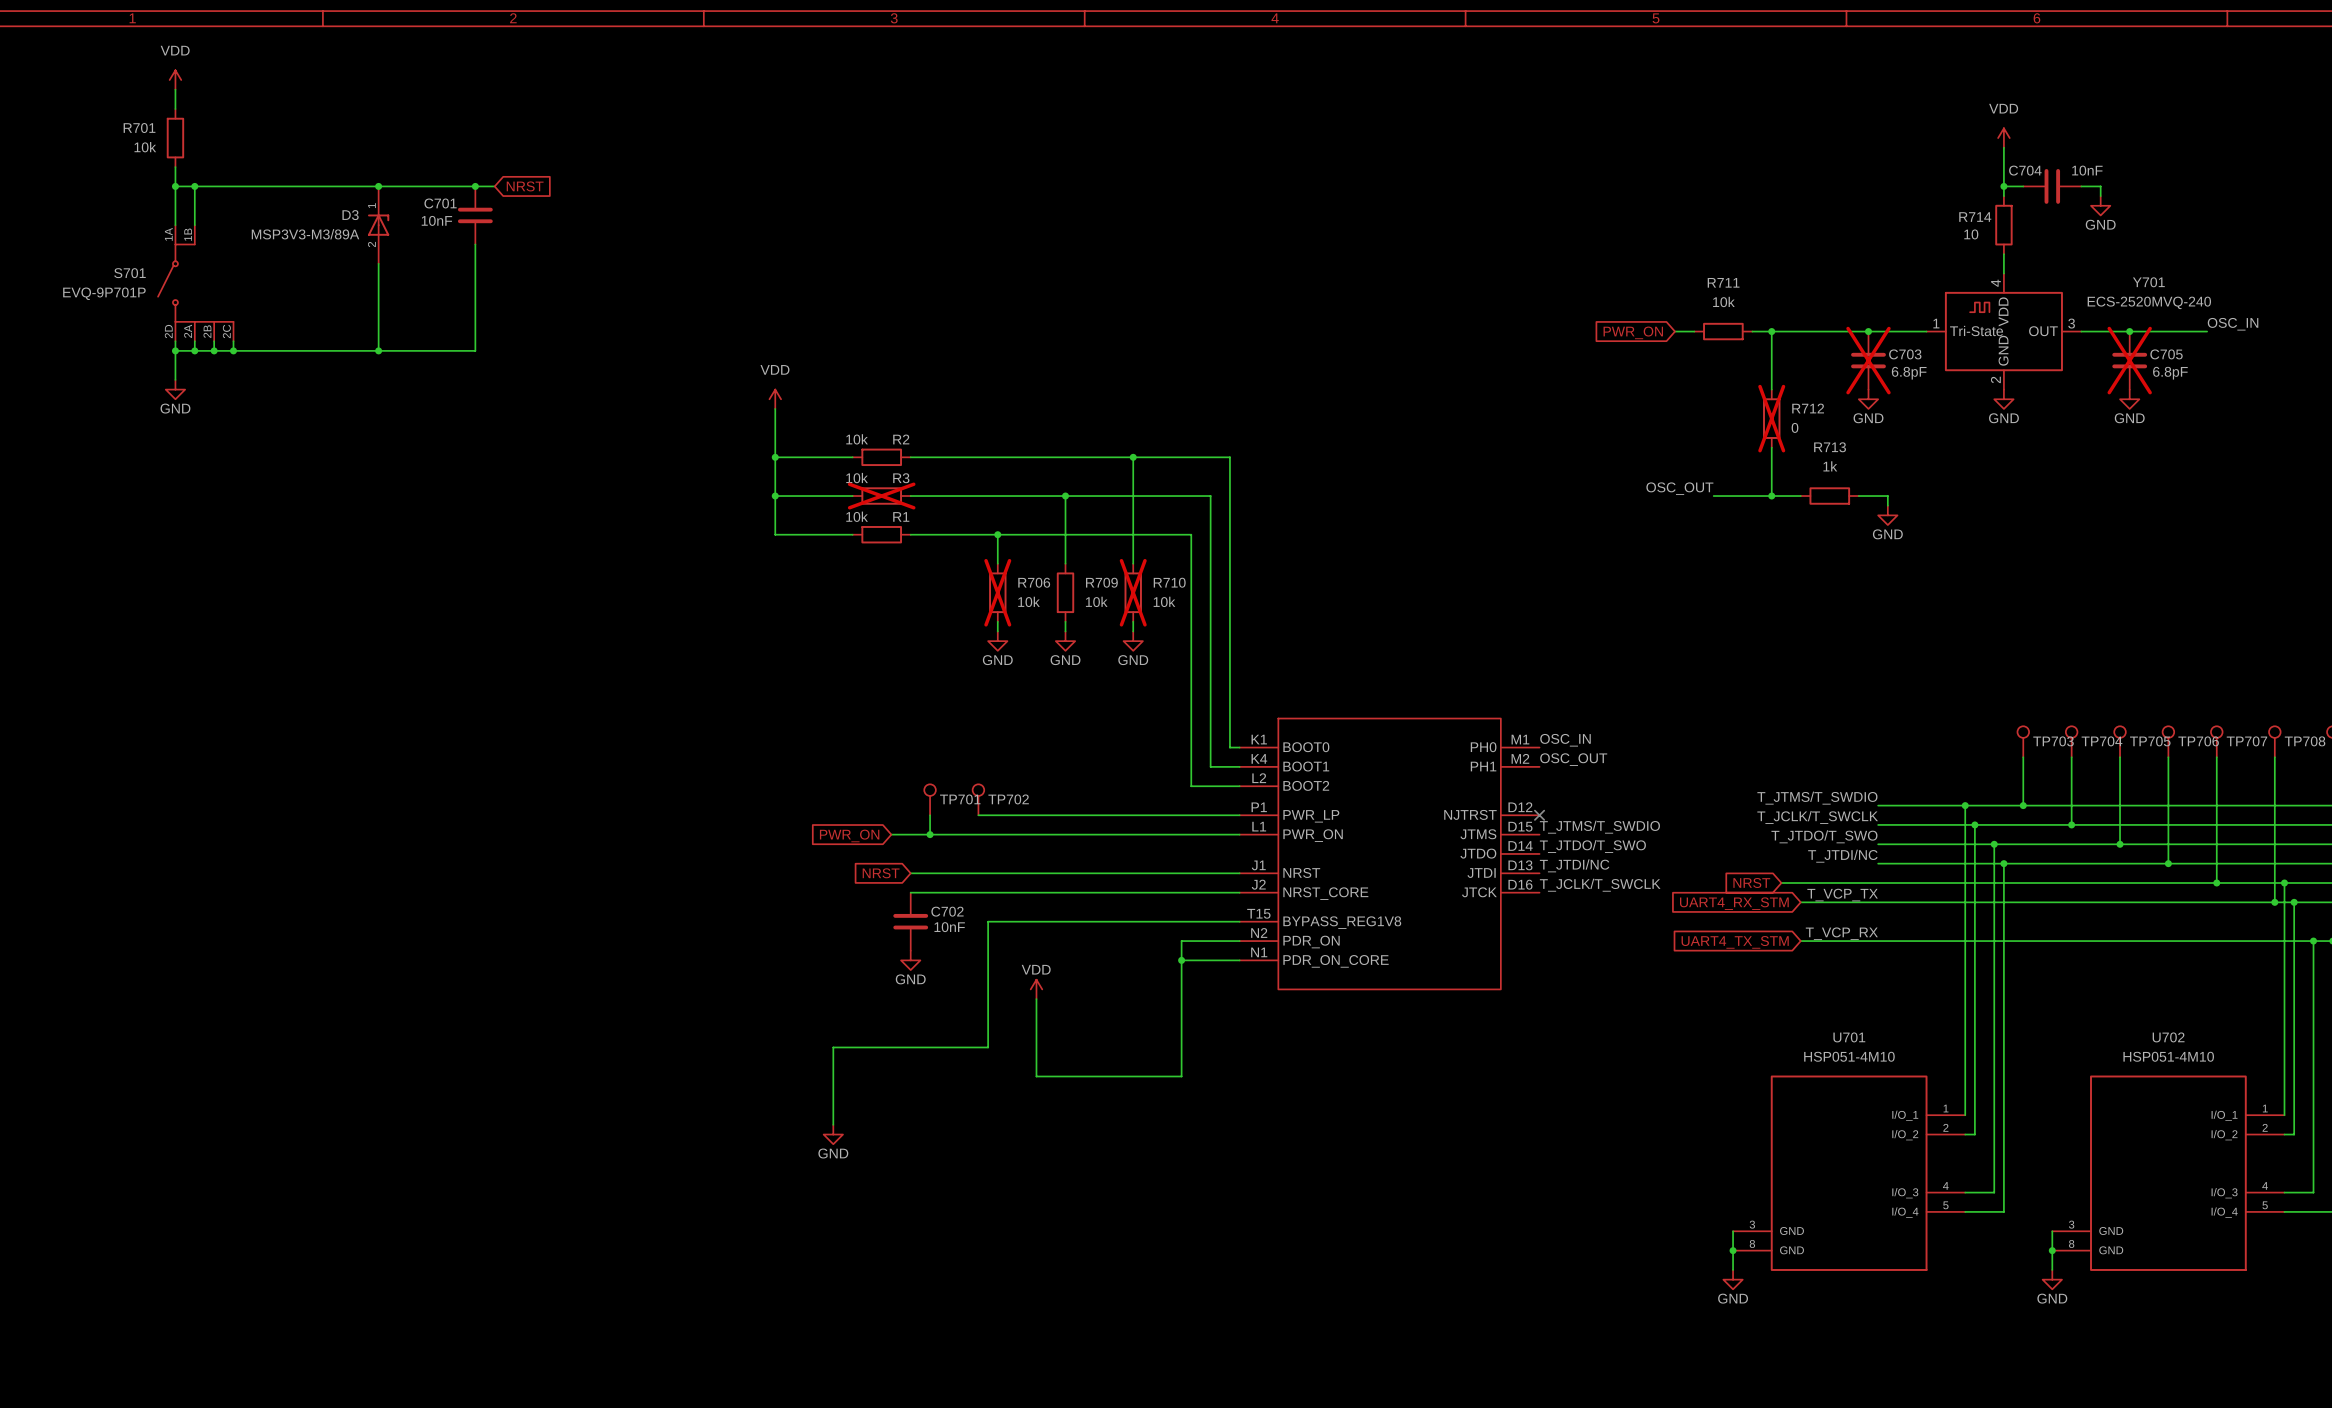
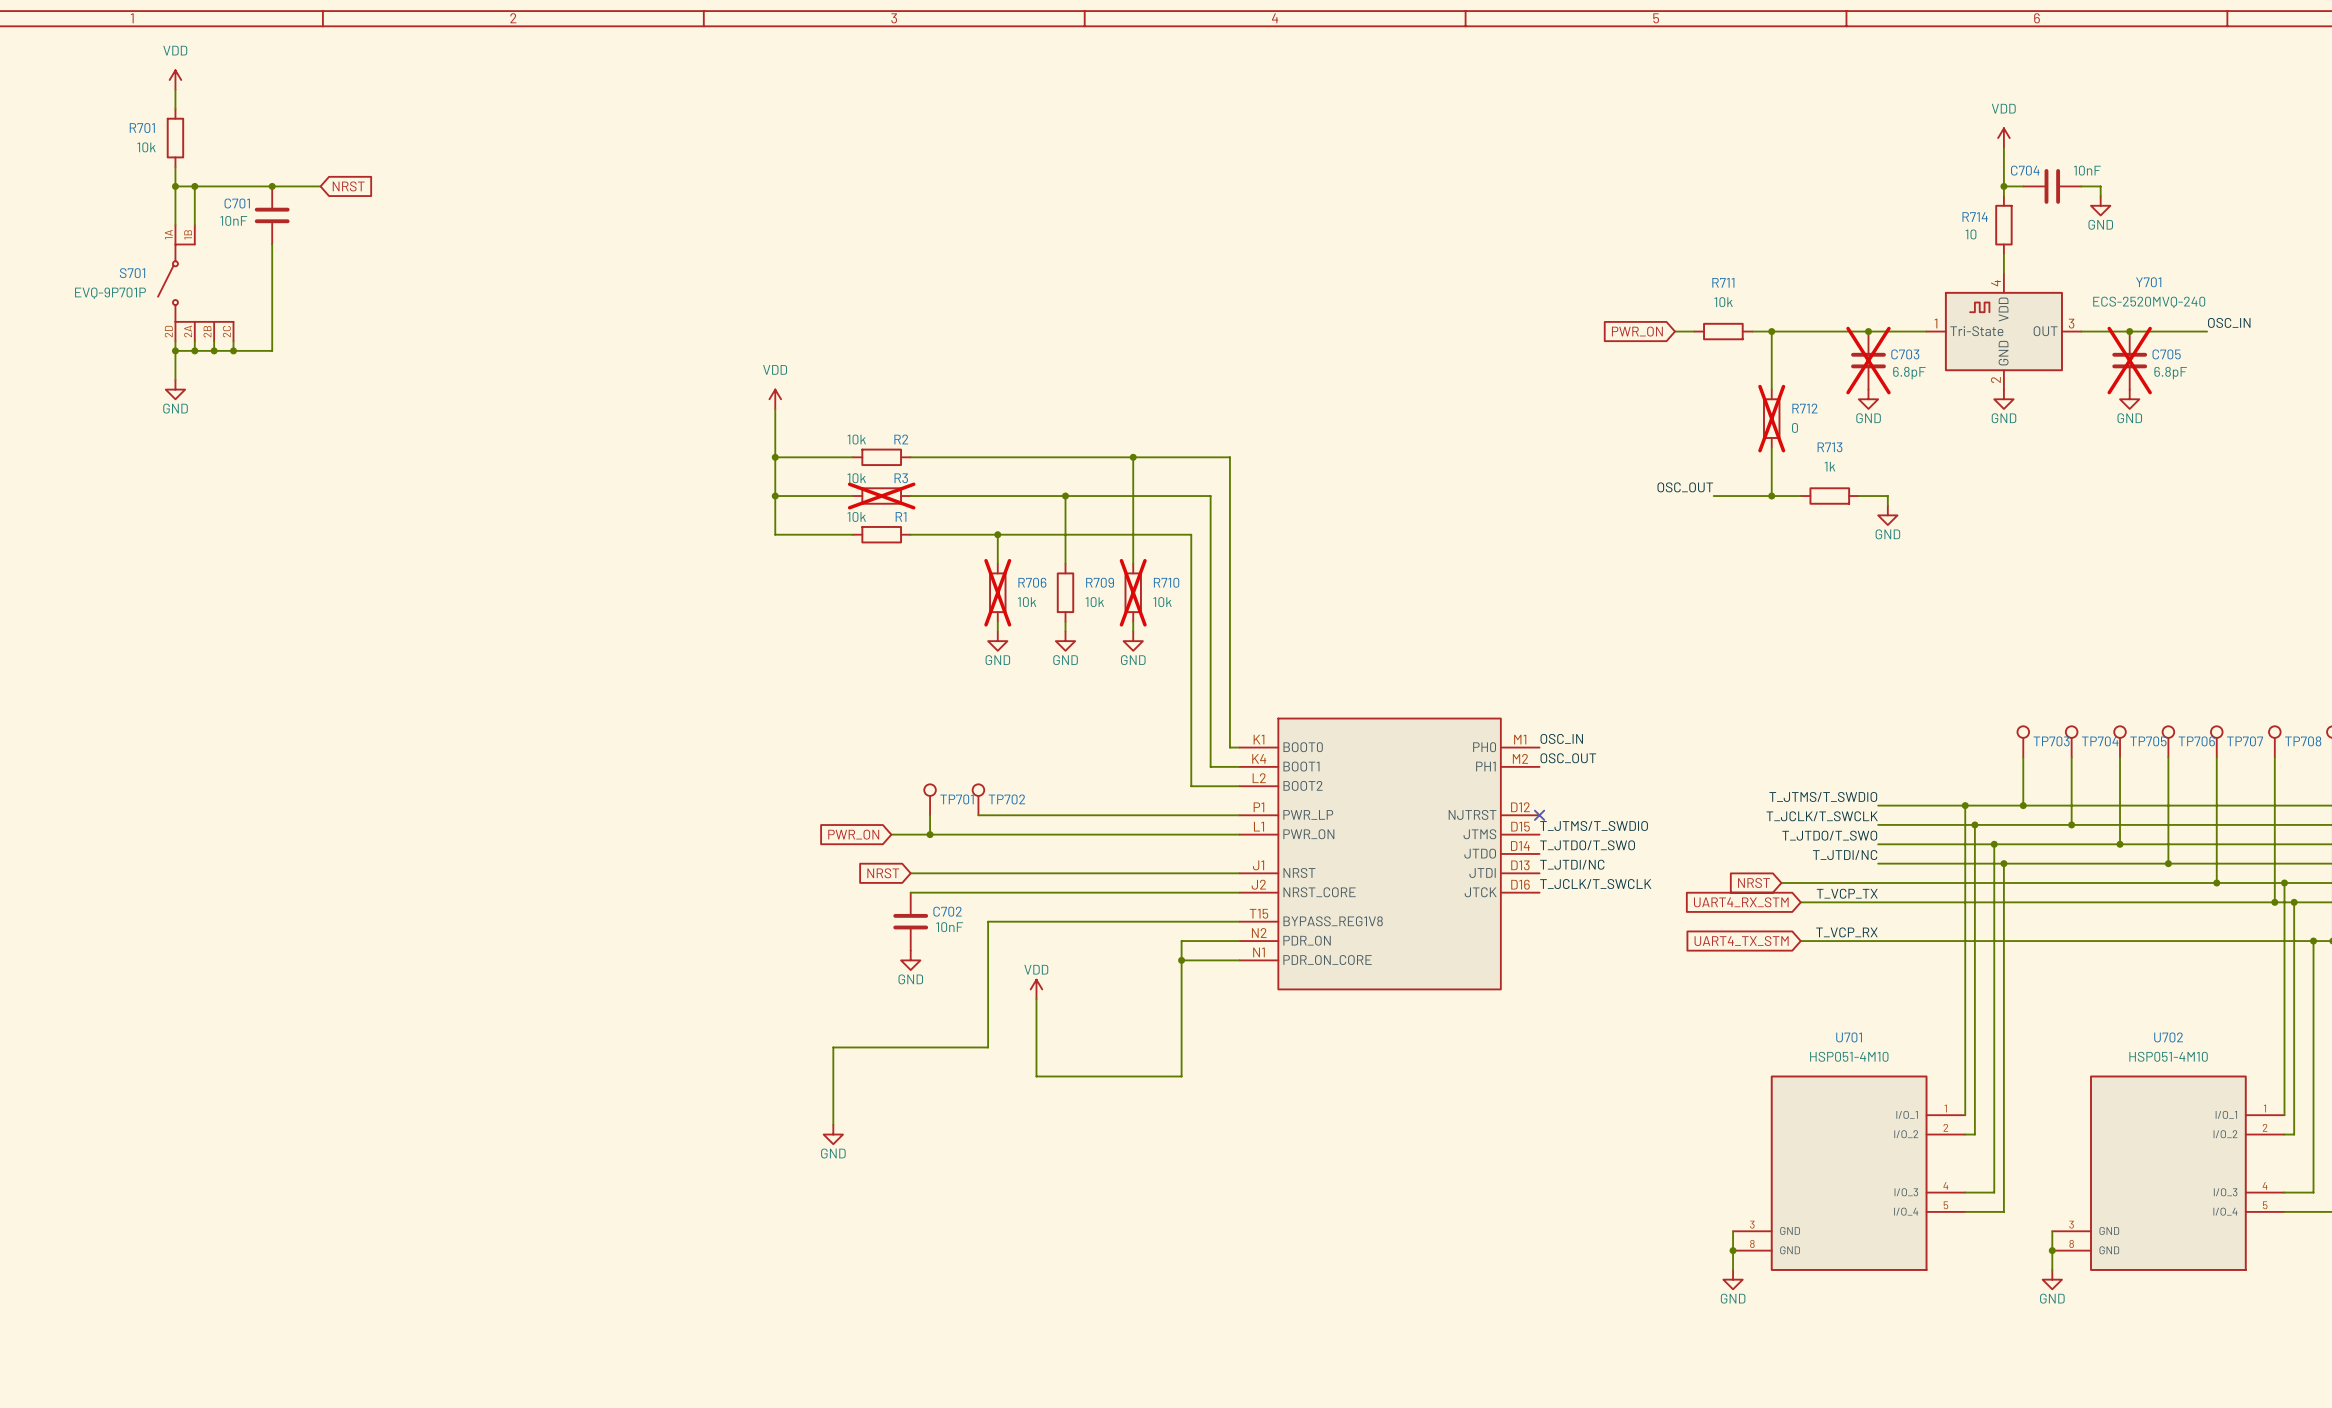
junction: none -> (272, 186)
wire: (320, 186) (494, 186) -> none
junction: (378, 186) -> none
junction: (475, 186) -> none
global label position: NRST (525, 186) -> NRST (348, 186)
C701 position: (475, 215) -> (272, 215)
D3: MSP3V3-M3/89A (378, 225) -> none
wire: (475, 244) (475, 350) (272, 350) -> (272, 244) (272, 350)
wire: (378, 263) (378, 350) -> none
junction: (378, 350) -> none

